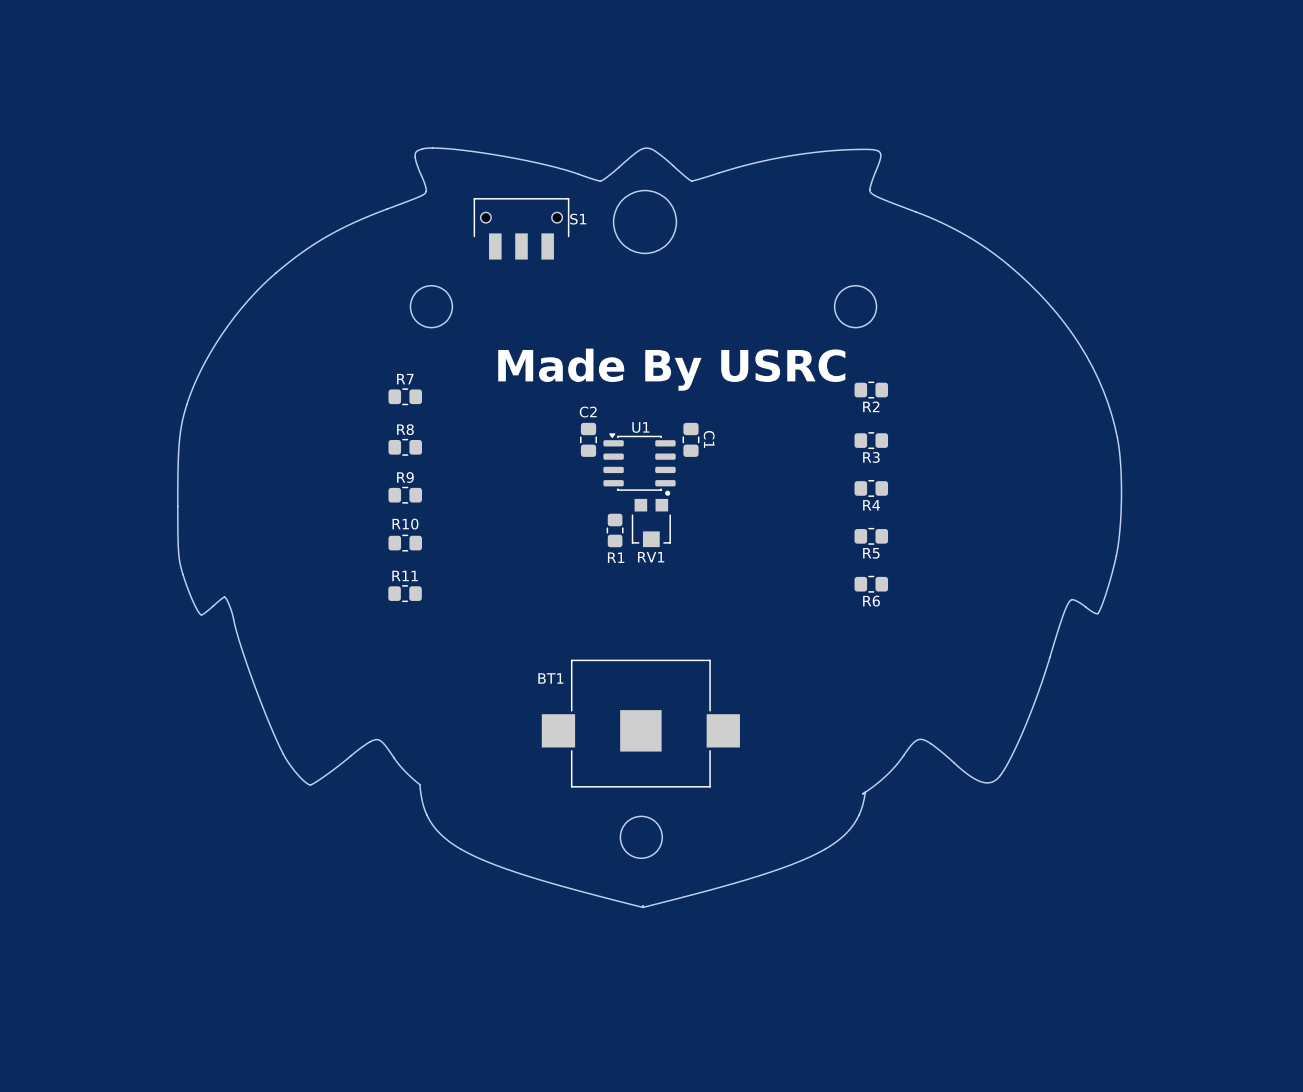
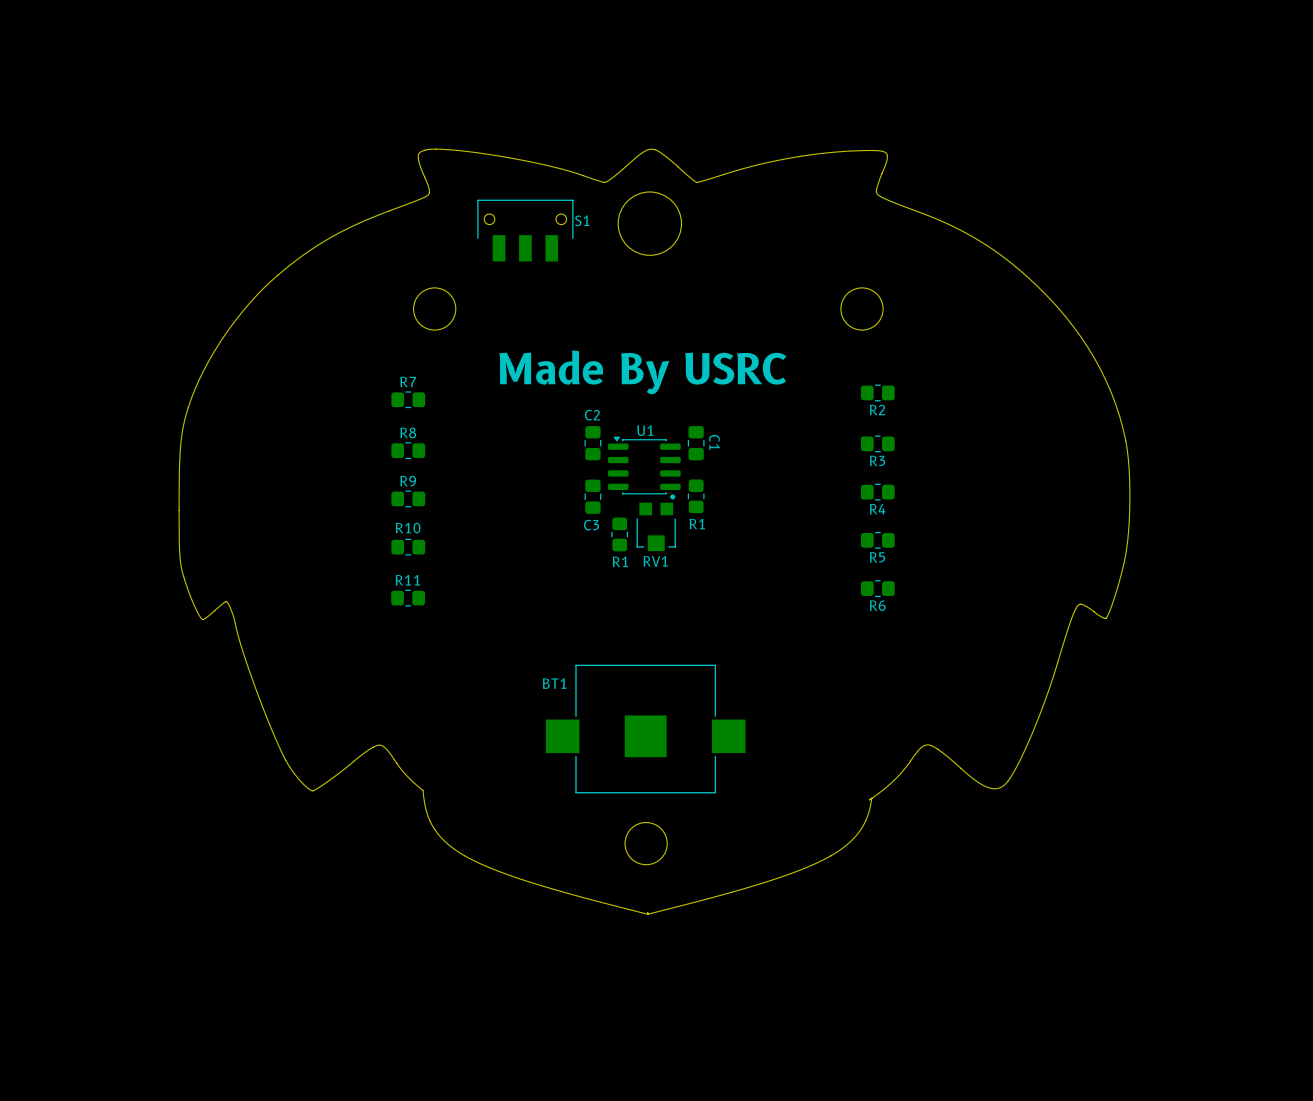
R1: none -> (696, 496)
C3: none -> (592, 496)

